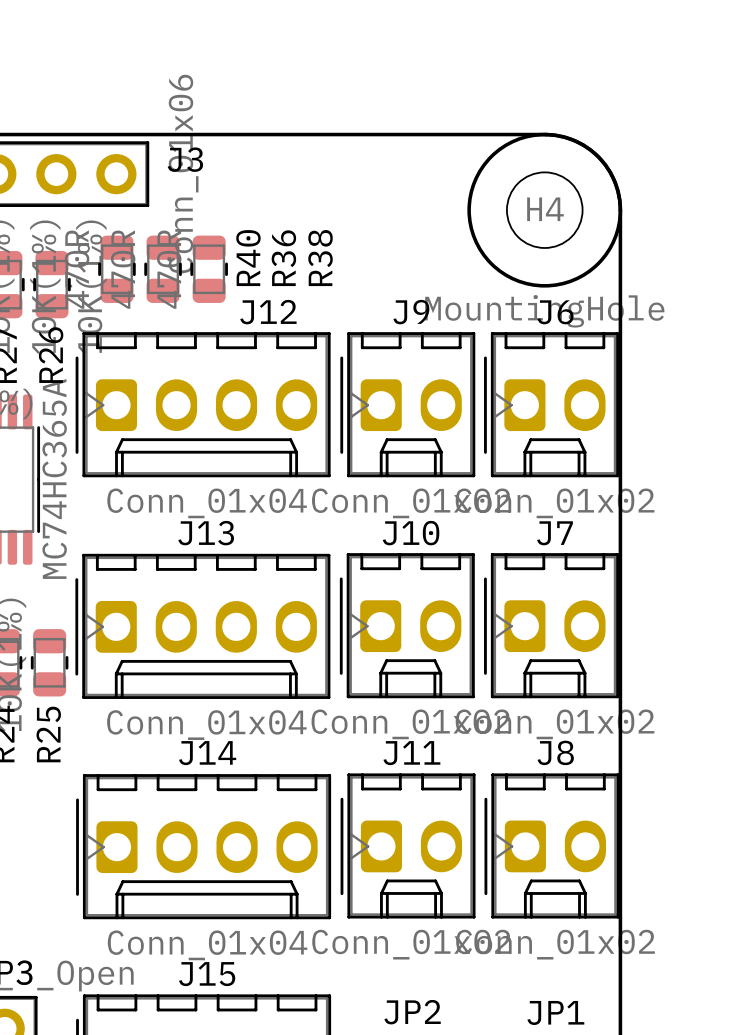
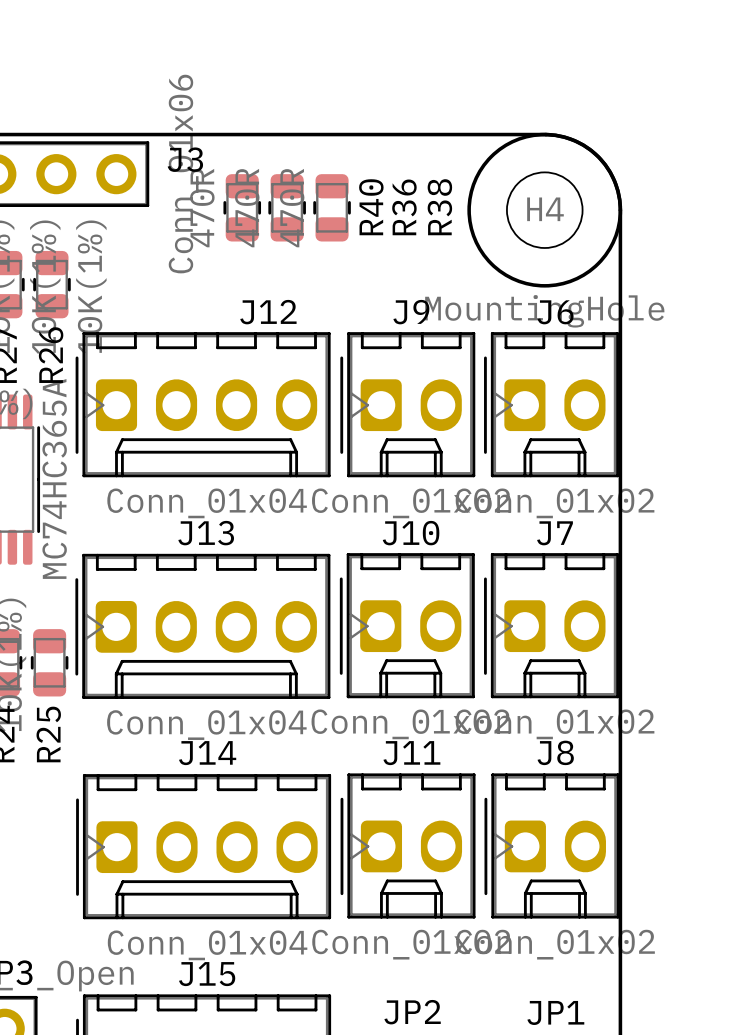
R40 name position: R40 (248, 258) -> R40 (371, 207)
R36 name position: R36 (283, 258) -> R36 (404, 207)
R38 name position: R38 (320, 258) -> R38 (439, 207)
R40 position: (116, 269) -> (242, 207)
R36 position: (163, 269) -> (287, 207)
R38 position: (209, 269) -> (332, 207)

